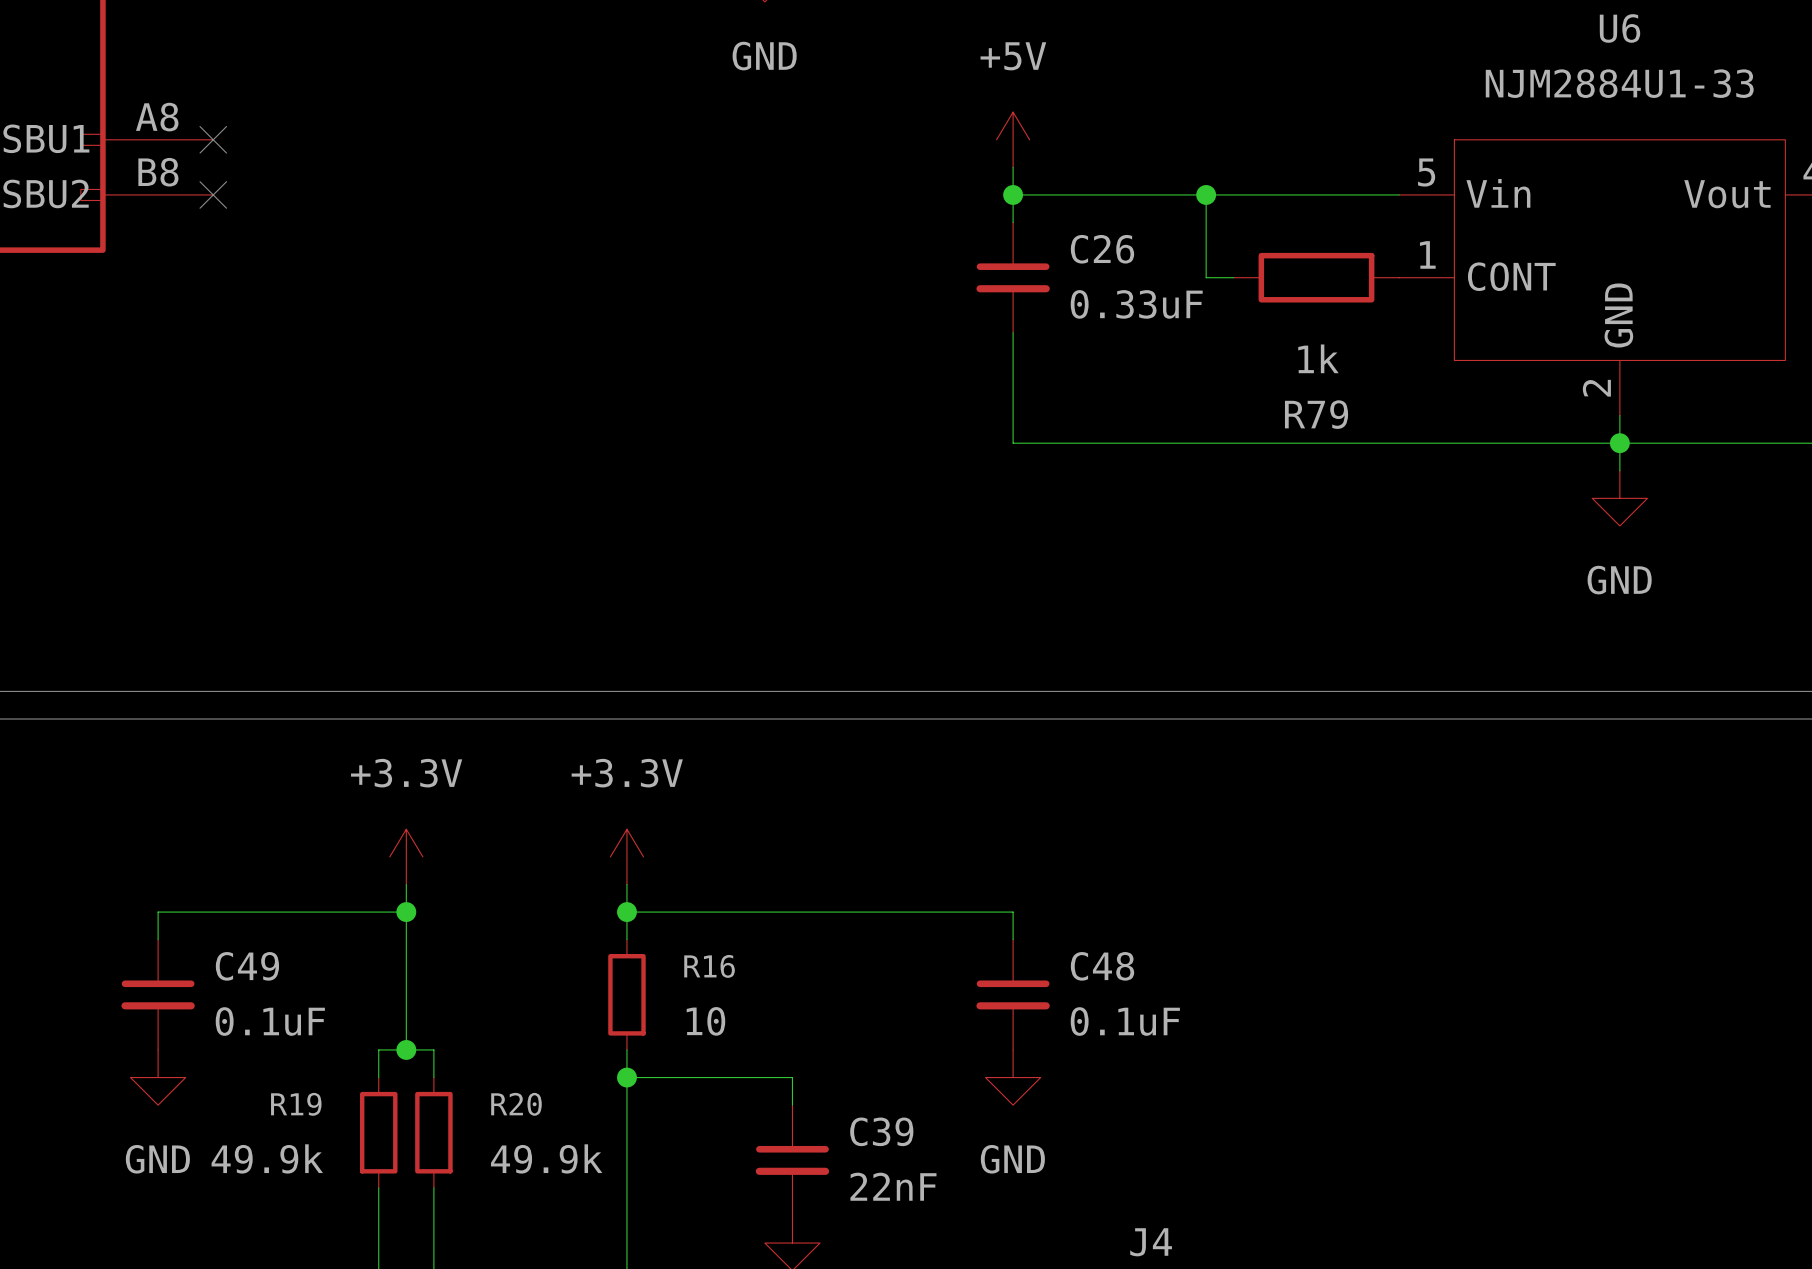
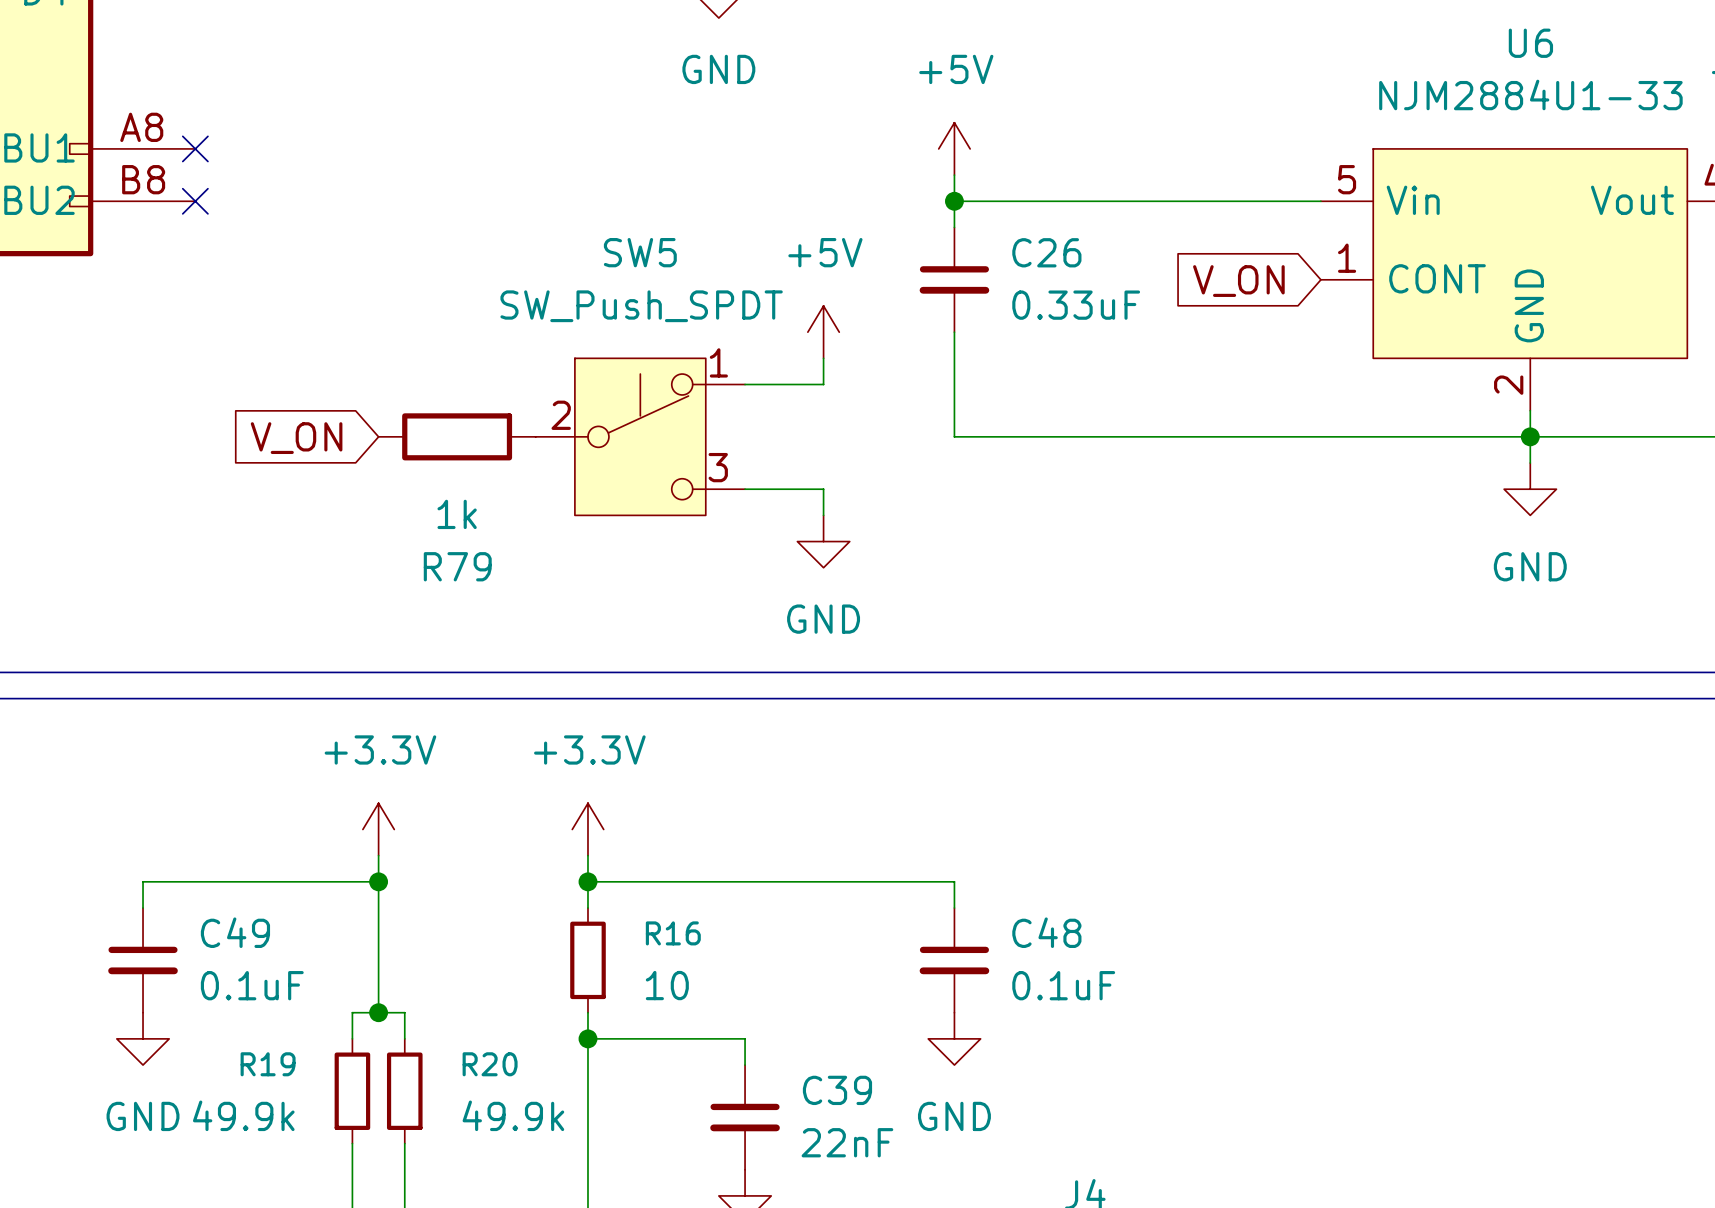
wire: (1206, 194) (1206, 277) (1233, 277) -> none
junction: (1206, 194) -> none
R79 position: (1316, 277) -> (457, 436)
global label: none -> V_ON (1238, 281)
power symbol: none -> +5V (823, 332)
wire: none -> (823, 358) (823, 384) (745, 384)
SW5: none -> SW_Push_SPDT (640, 436)
global label: none -> V_ON (296, 438)
wire: none -> (745, 489) (823, 489) (823, 515)
power symbol: none -> GND (823, 541)

